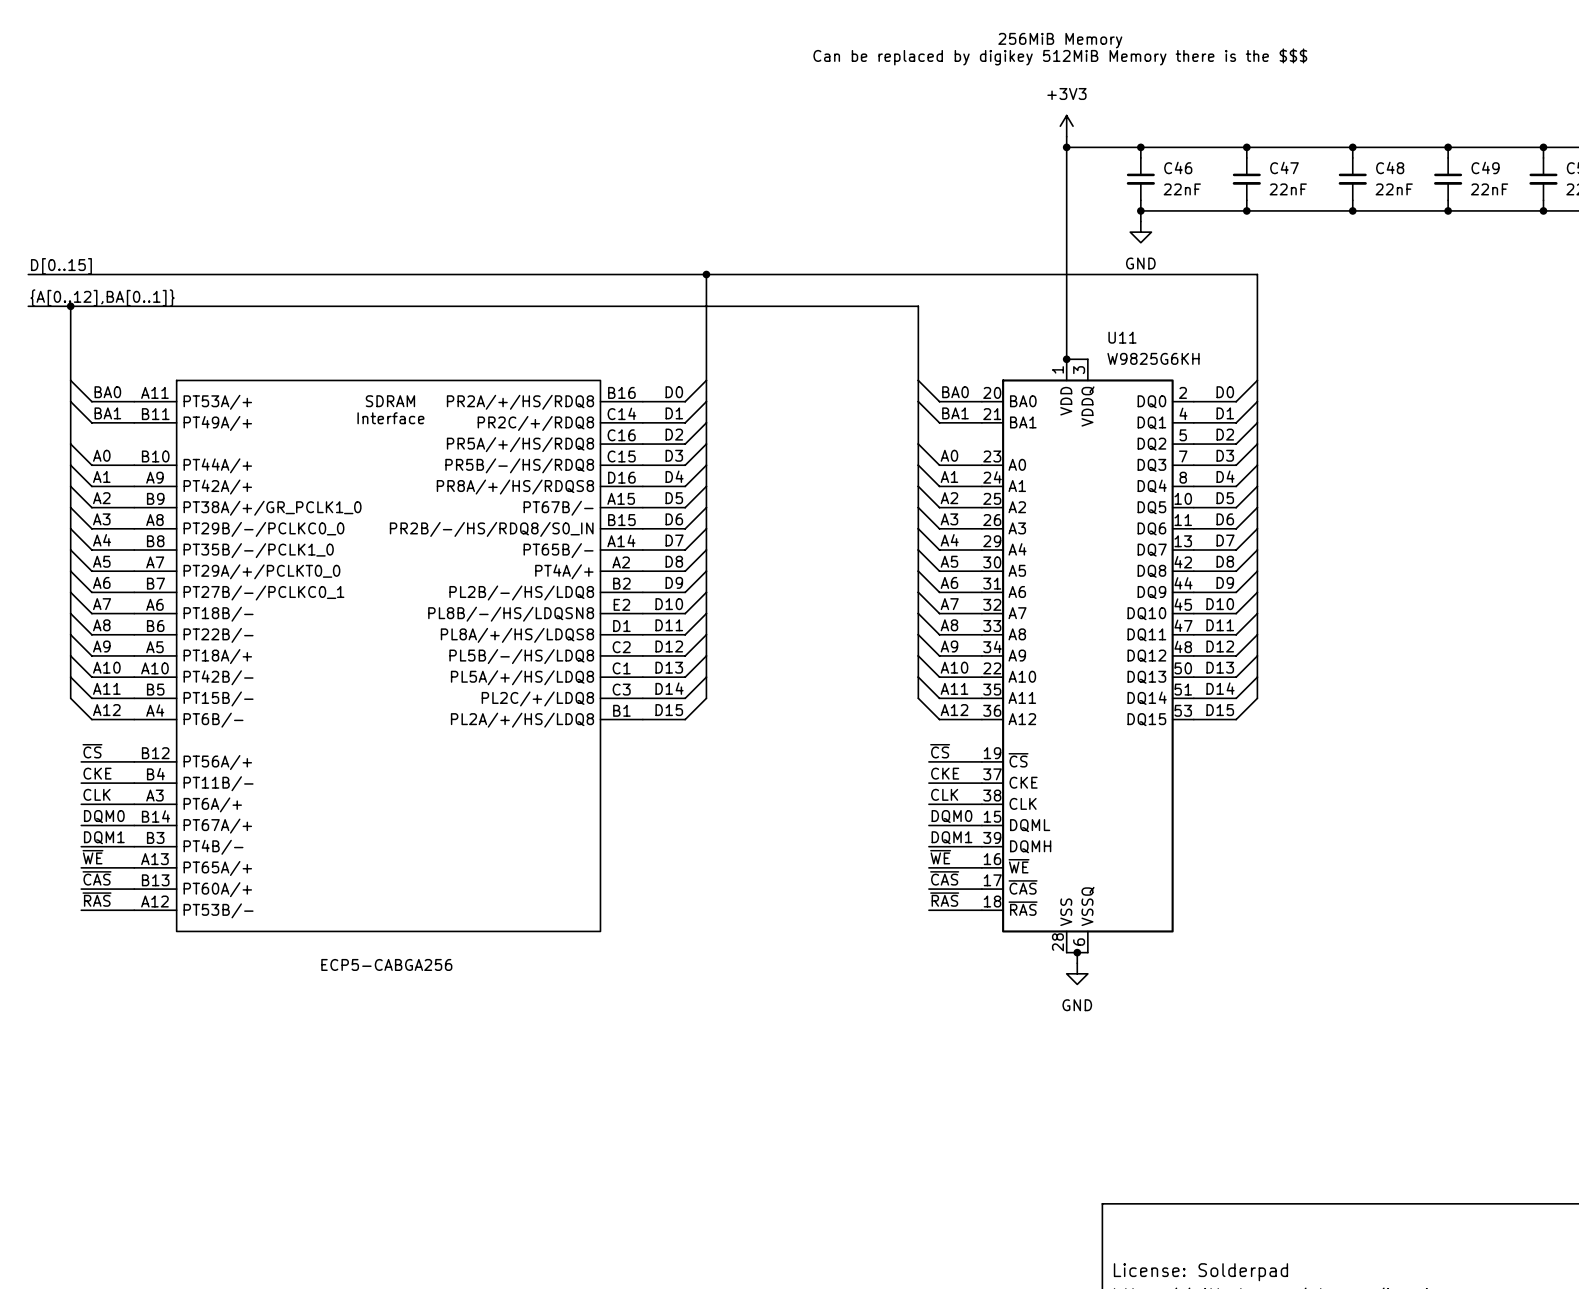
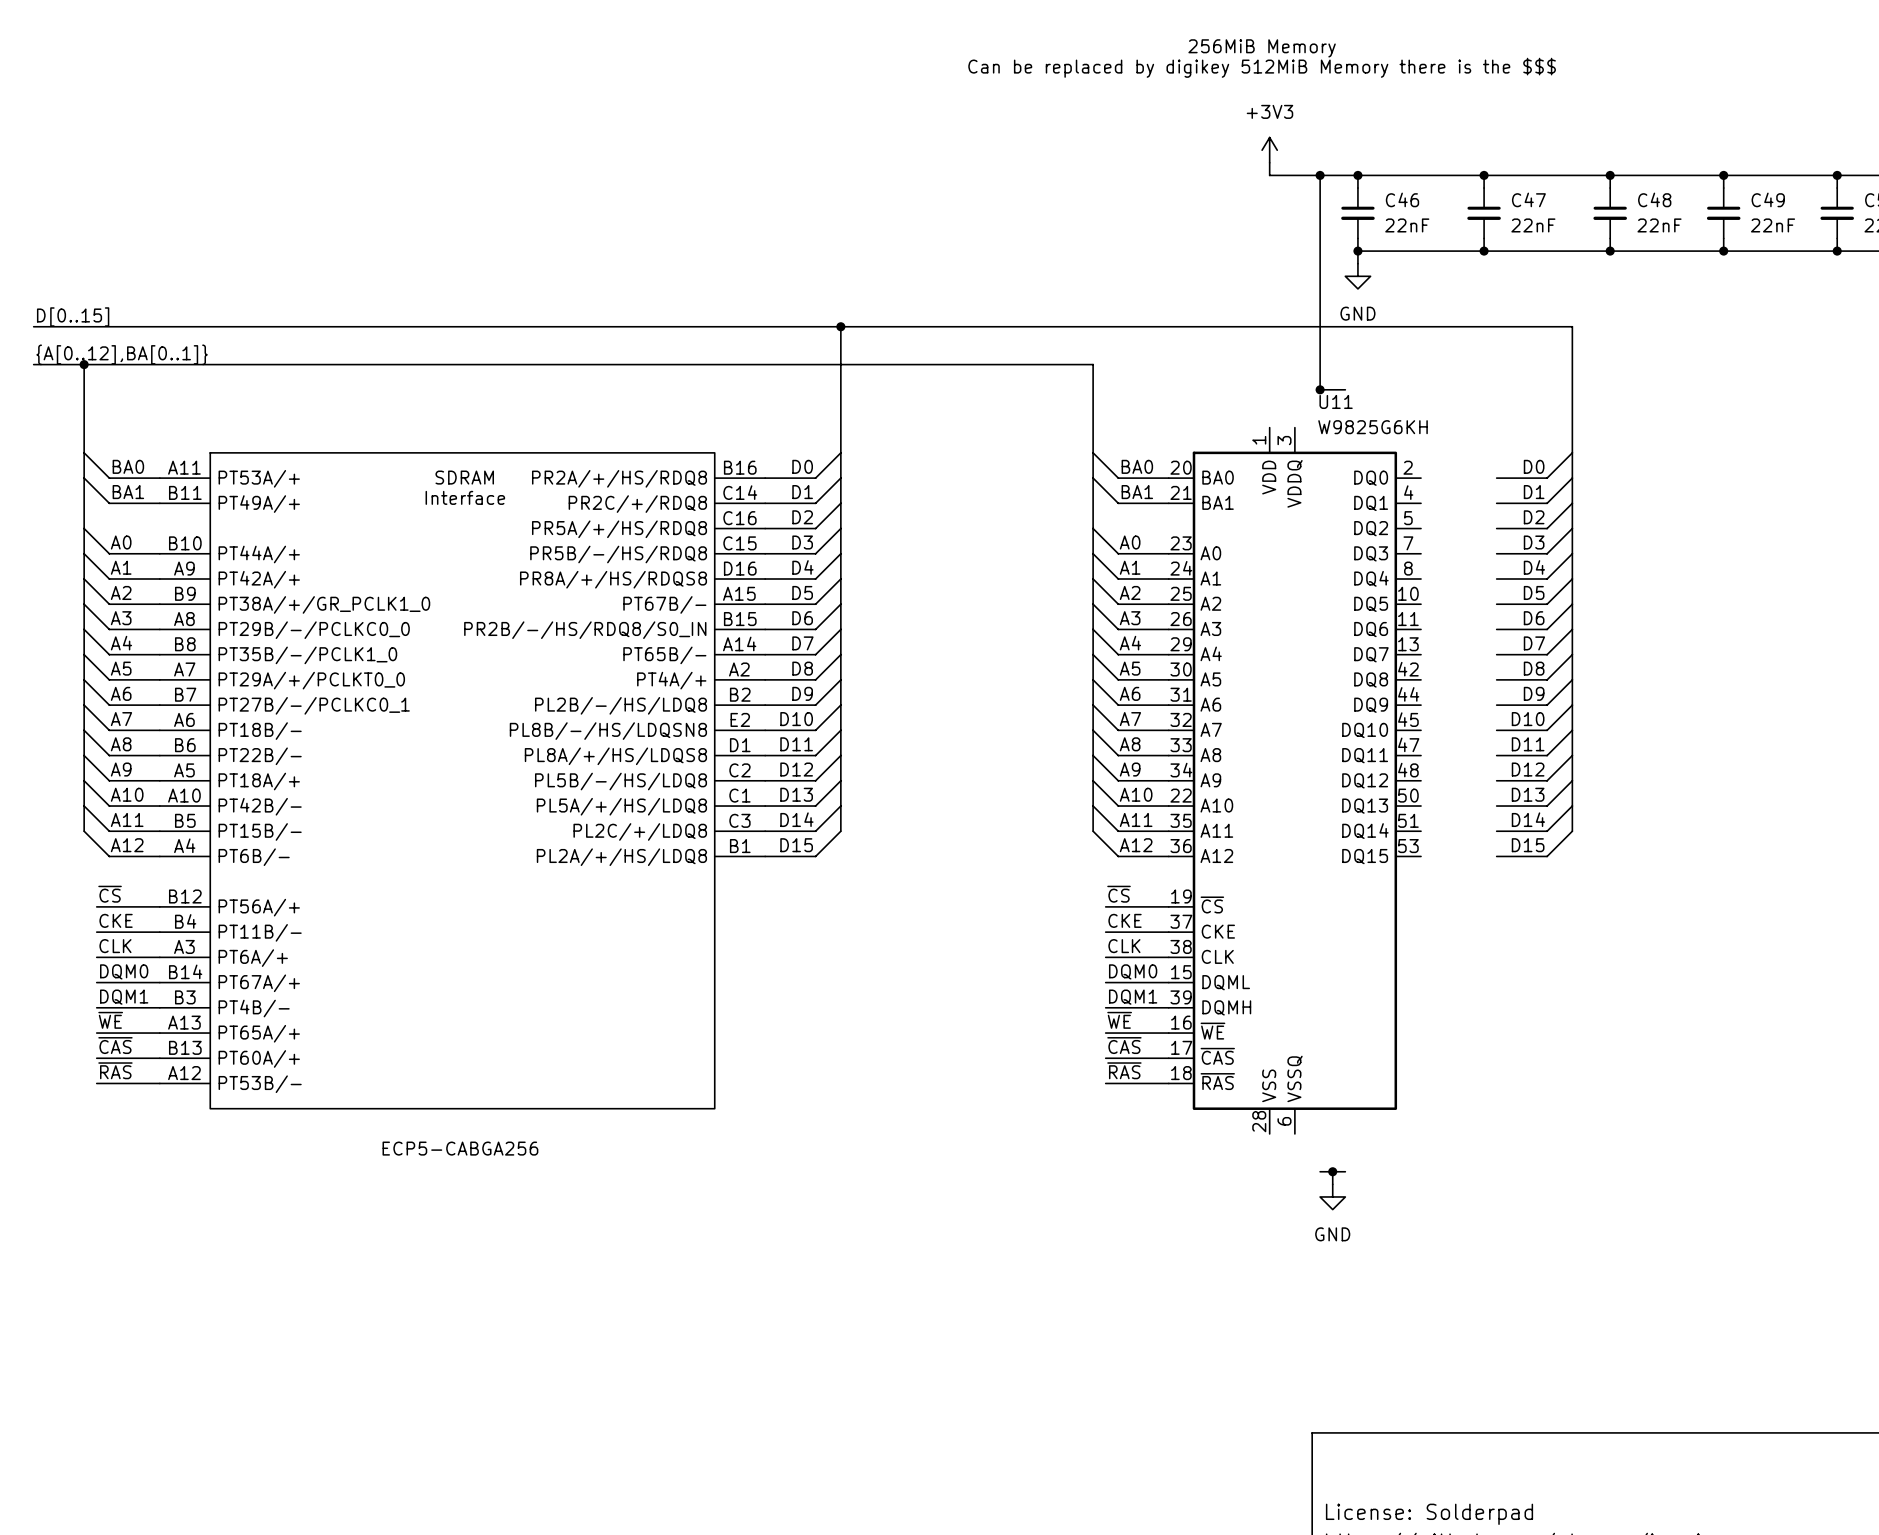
wire: (1066, 147) (1066, 359) (1087, 359) -> none
junction position: (1066, 147) -> (1320, 175)
wire: none -> (1320, 175) (1320, 389) (1345, 389)
bus: (1257, 274) (1257, 698) -> (1496, 326) (1572, 326) (1572, 831)
junction: none -> (1320, 389)
junction: (1066, 359) -> none
wire: (1257, 380) (1236, 401) (1193, 401) -> none
label position: D0 (1225, 392) -> D0 (1534, 466)
wire: (1257, 401) (1236, 422) (1193, 422) -> (1496, 478) (1547, 478) (1572, 452)
label position: D1 (1225, 413) -> D1 (1534, 492)
wire: (1257, 422) (1236, 444) (1193, 444) -> (1496, 503) (1547, 503) (1572, 478)
label position: D2 (1225, 434) -> D2 (1534, 517)
wire: (1257, 444) (1236, 465) (1193, 465) -> (1496, 528) (1547, 528) (1572, 503)
label position: D3 (1225, 455) -> D3 (1534, 542)
wire: (1257, 465) (1236, 486) (1193, 486) -> (1496, 553) (1547, 553) (1572, 528)
label position: D4 (1225, 476) -> D4 (1534, 567)
wire: (1257, 486) (1236, 507) (1193, 507) -> (1496, 579) (1547, 579) (1572, 553)
label position: D5 (1225, 498) -> D5 (1534, 592)
wire: (1257, 507) (1236, 528) (1193, 528) -> (1496, 604) (1547, 604) (1572, 579)
label position: D6 (1225, 519) -> D6 (1534, 618)
wire: (1257, 528) (1236, 550) (1193, 550) -> (1496, 629) (1547, 629) (1572, 604)
label position: D7 (1225, 540) -> D7 (1534, 643)
wire: (1257, 550) (1236, 571) (1193, 571) -> (1496, 654) (1547, 654) (1572, 629)
label position: D8 (1225, 561) -> D8 (1534, 668)
wire: (1257, 571) (1236, 592) (1193, 592) -> (1496, 679) (1547, 679) (1572, 654)
label position: D9 (1225, 582) -> D9 (1534, 693)
wire: (1257, 592) (1236, 613) (1193, 613) -> (1496, 705) (1547, 705) (1572, 679)
label position: D10 (1220, 604) -> D10 (1528, 719)
wire: (1257, 613) (1236, 634) (1193, 634) -> (1496, 730) (1547, 730) (1572, 705)
label position: D11 (1220, 625) -> D11 (1528, 744)
wire: (1257, 634) (1236, 655) (1193, 655) -> (1496, 755) (1547, 755) (1572, 730)
label position: D12 (1220, 646) -> D12 (1528, 769)
wire: (1257, 655) (1236, 677) (1193, 677) -> (1496, 780) (1547, 780) (1572, 755)
label position: D13 (1220, 667) -> D13 (1528, 794)
wire: (1257, 677) (1236, 698) (1193, 698) -> (1496, 806) (1547, 806) (1572, 780)
label position: D14 (1220, 688) -> D14 (1528, 819)
wire: (1257, 698) (1236, 719) (1193, 719) -> (1496, 831) (1547, 831) (1572, 806)
wire: none -> (1572, 831) (1547, 856) (1496, 856)
label position: D15 (1220, 710) -> D15 (1528, 845)
wire: (1066, 952) (1087, 952) -> (1320, 1171) (1345, 1171)
wire: (1077, 952) (1077, 963) -> (1332, 1171) (1332, 1184)
junction: (1077, 952) -> none
power symbol position: GND (1077, 973) -> GND (1332, 1196)
junction: none -> (1332, 1171)

